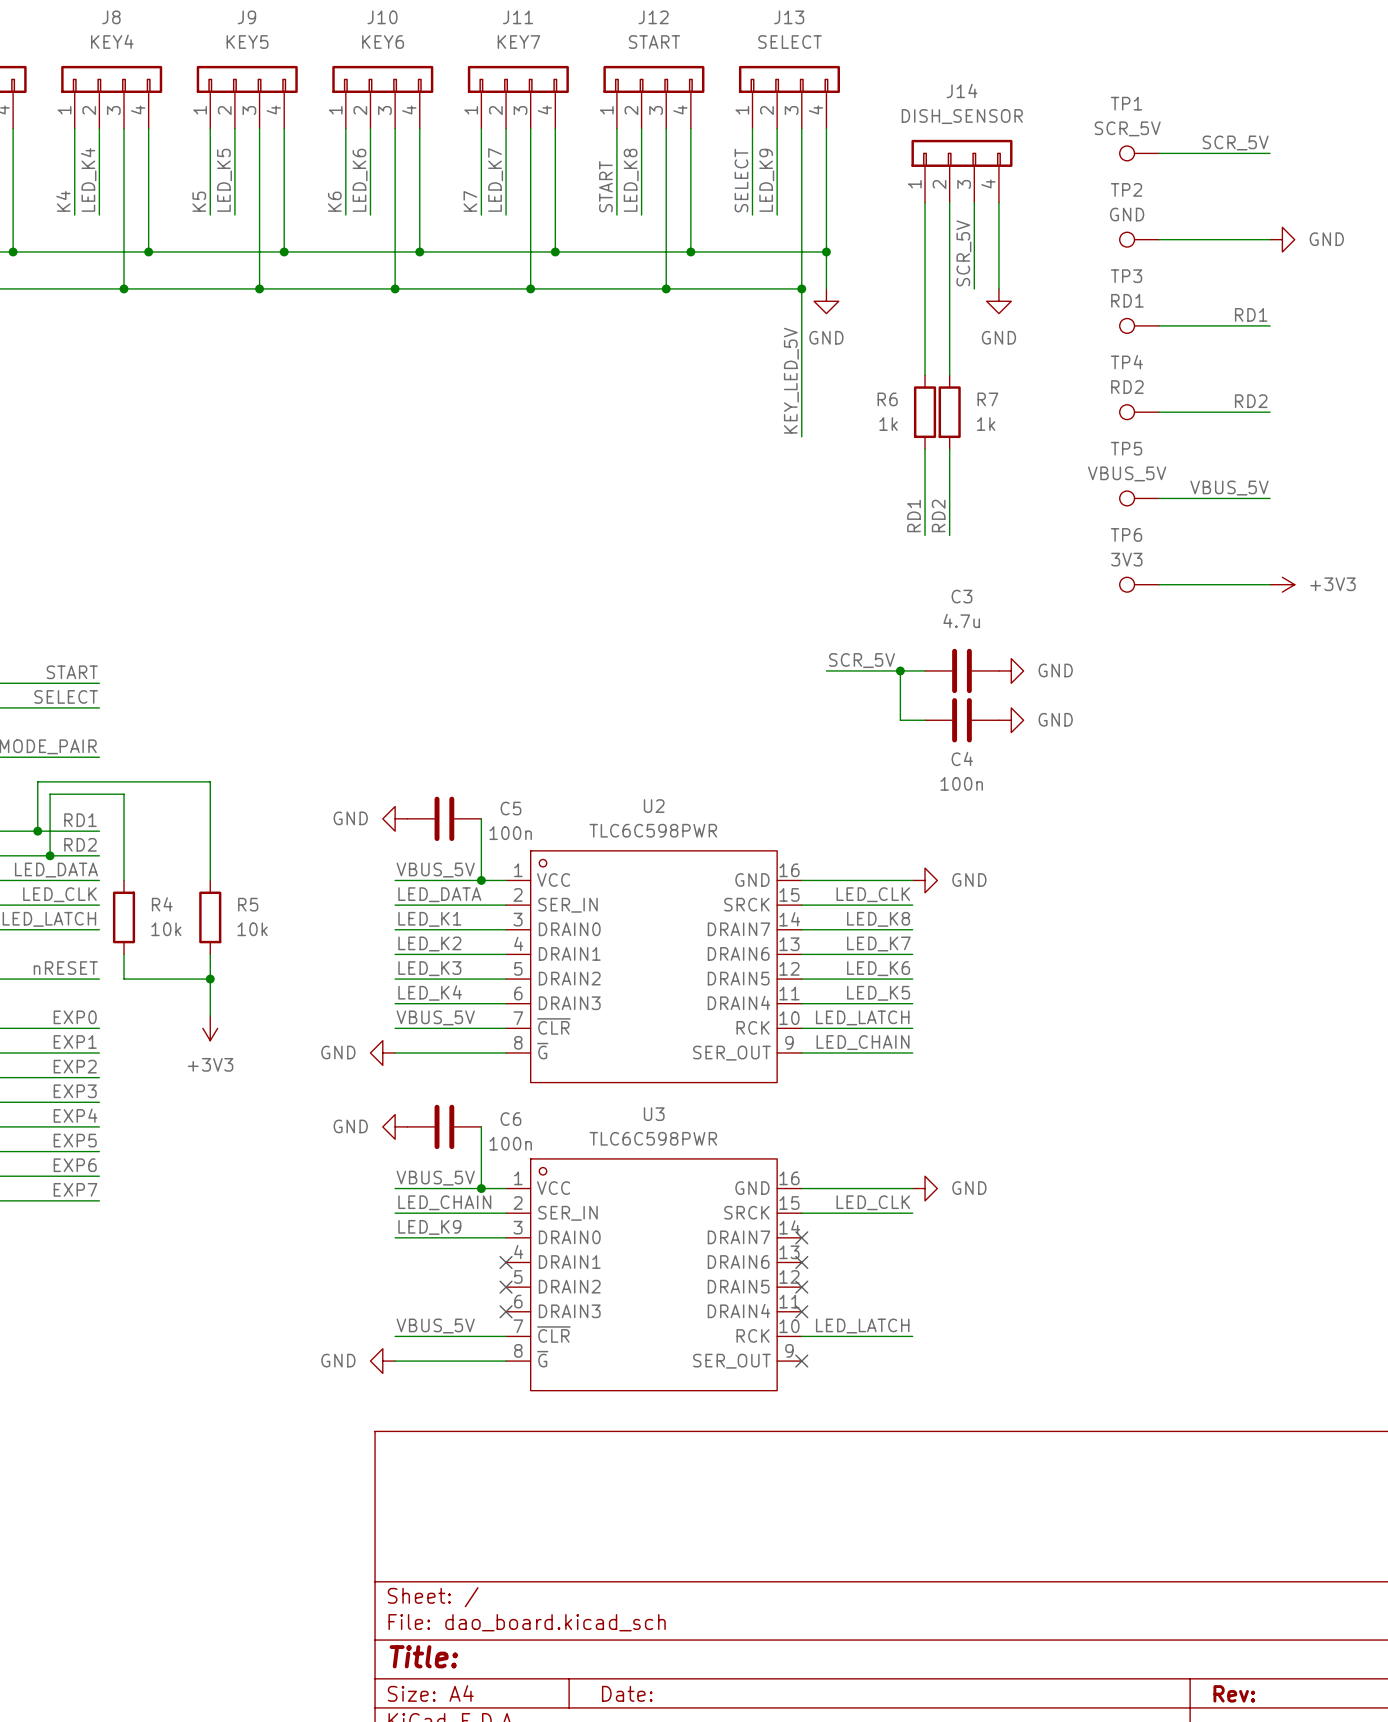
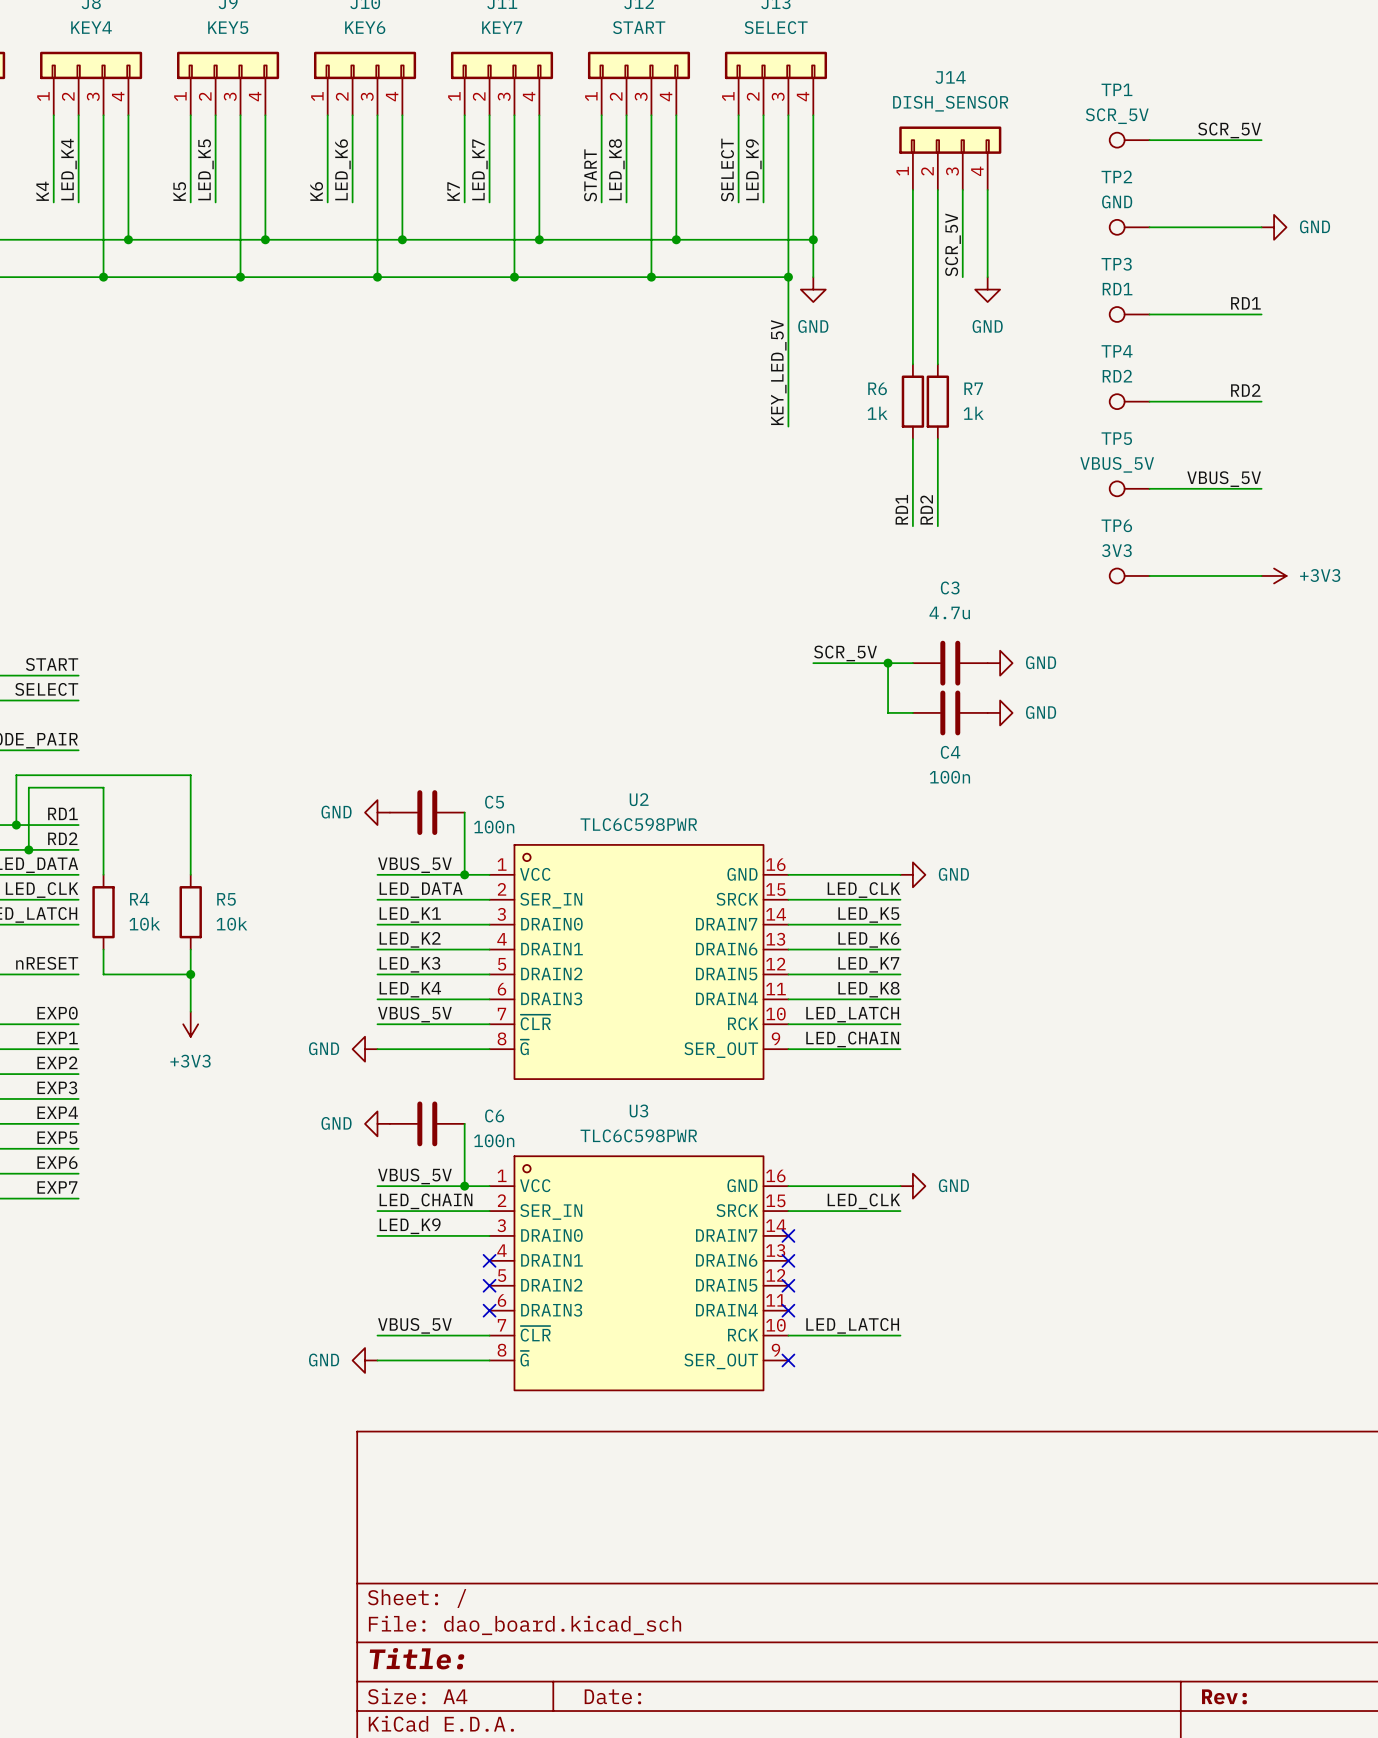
label: LED_K8 (878, 919) -> LED_K5 (868, 915)
label: LED_K7 (878, 943) -> LED_K6 (868, 939)
label: LED_K6 (878, 968) -> LED_K7 (868, 964)
label: LED_K5 (878, 993) -> LED_K8 (868, 989)

